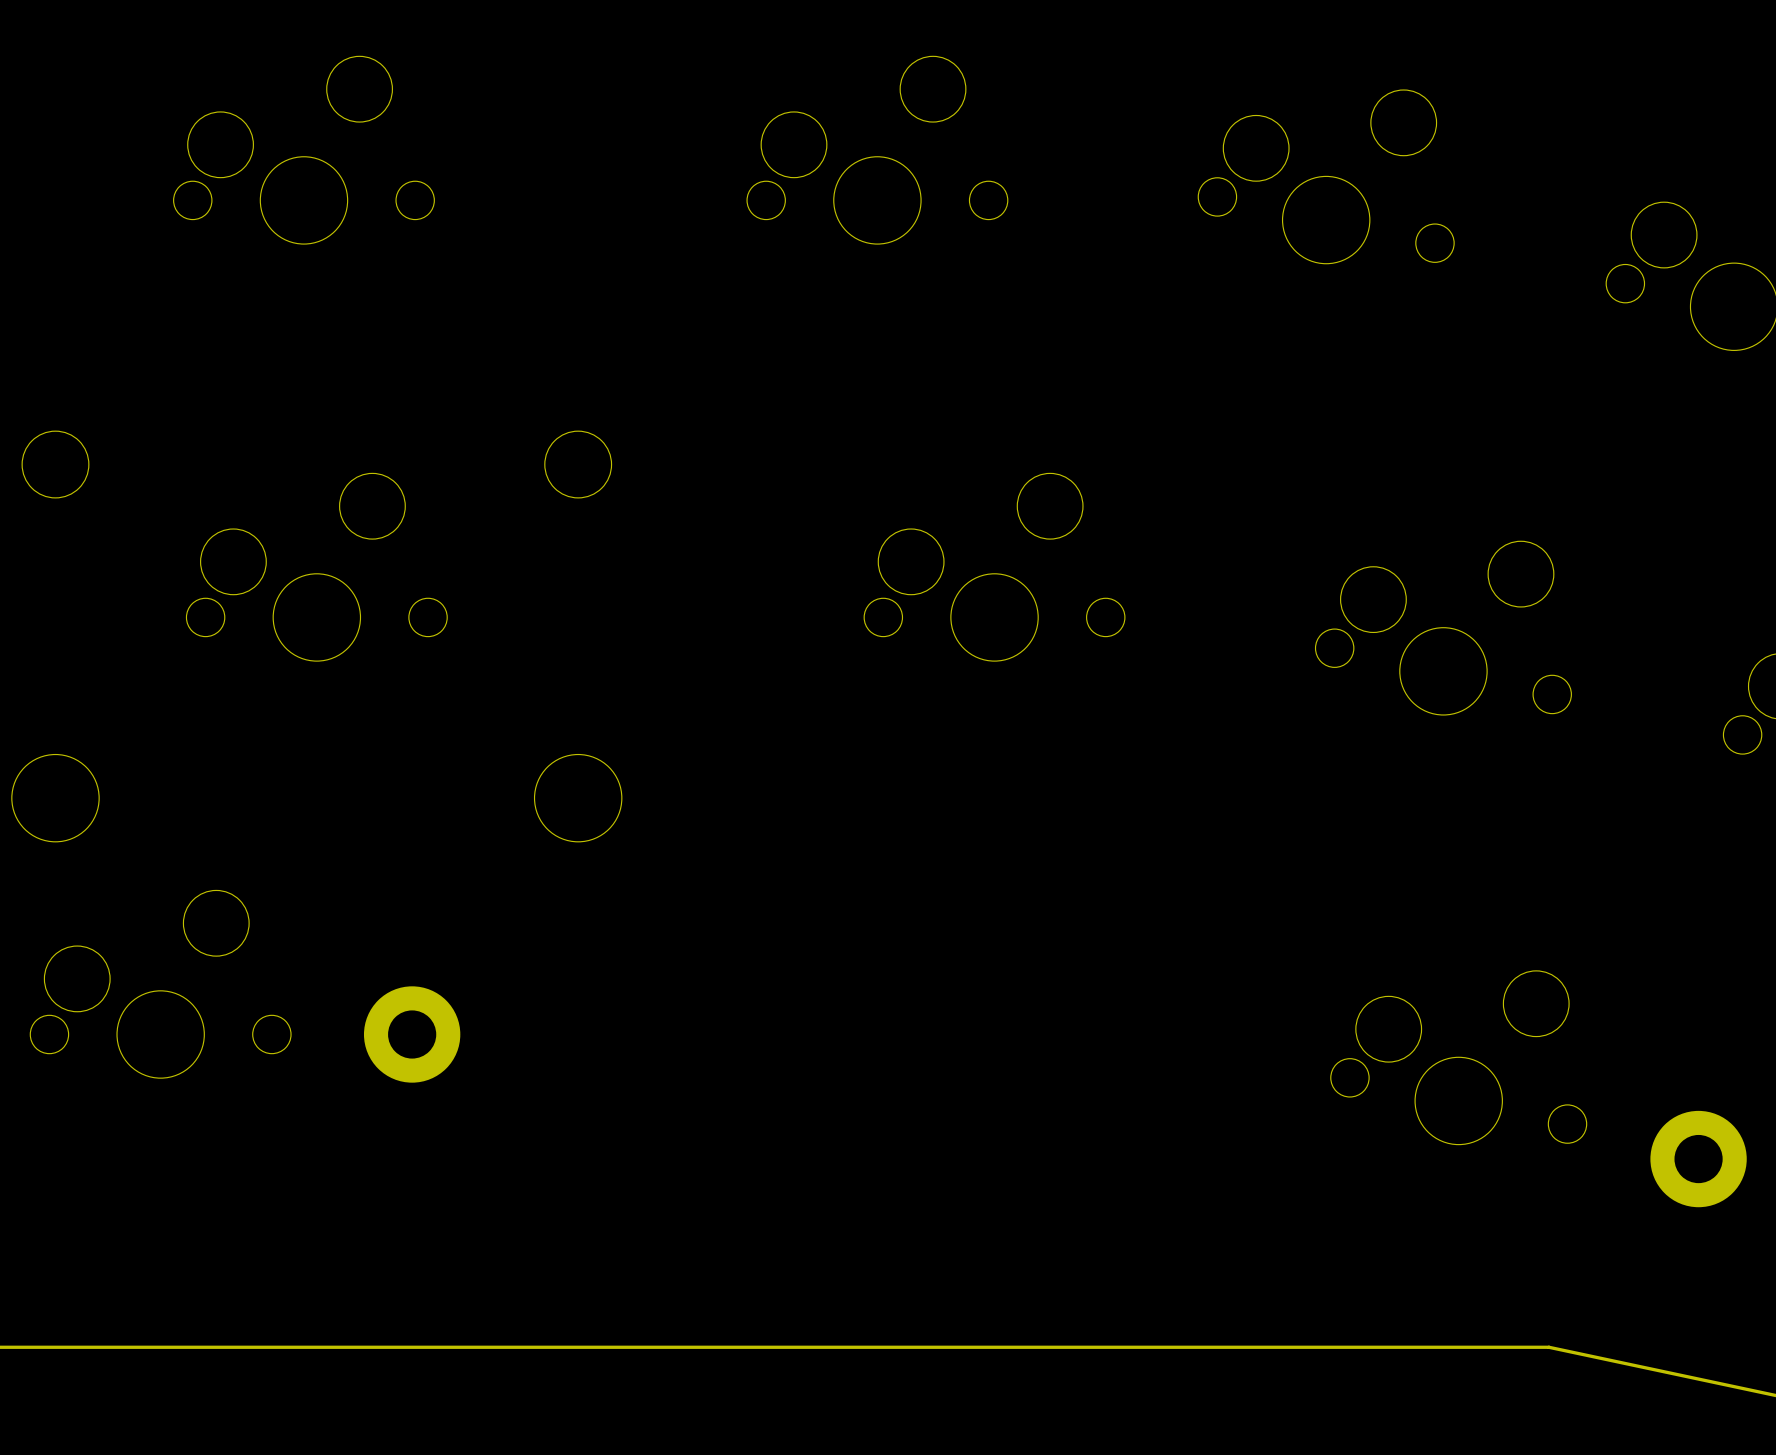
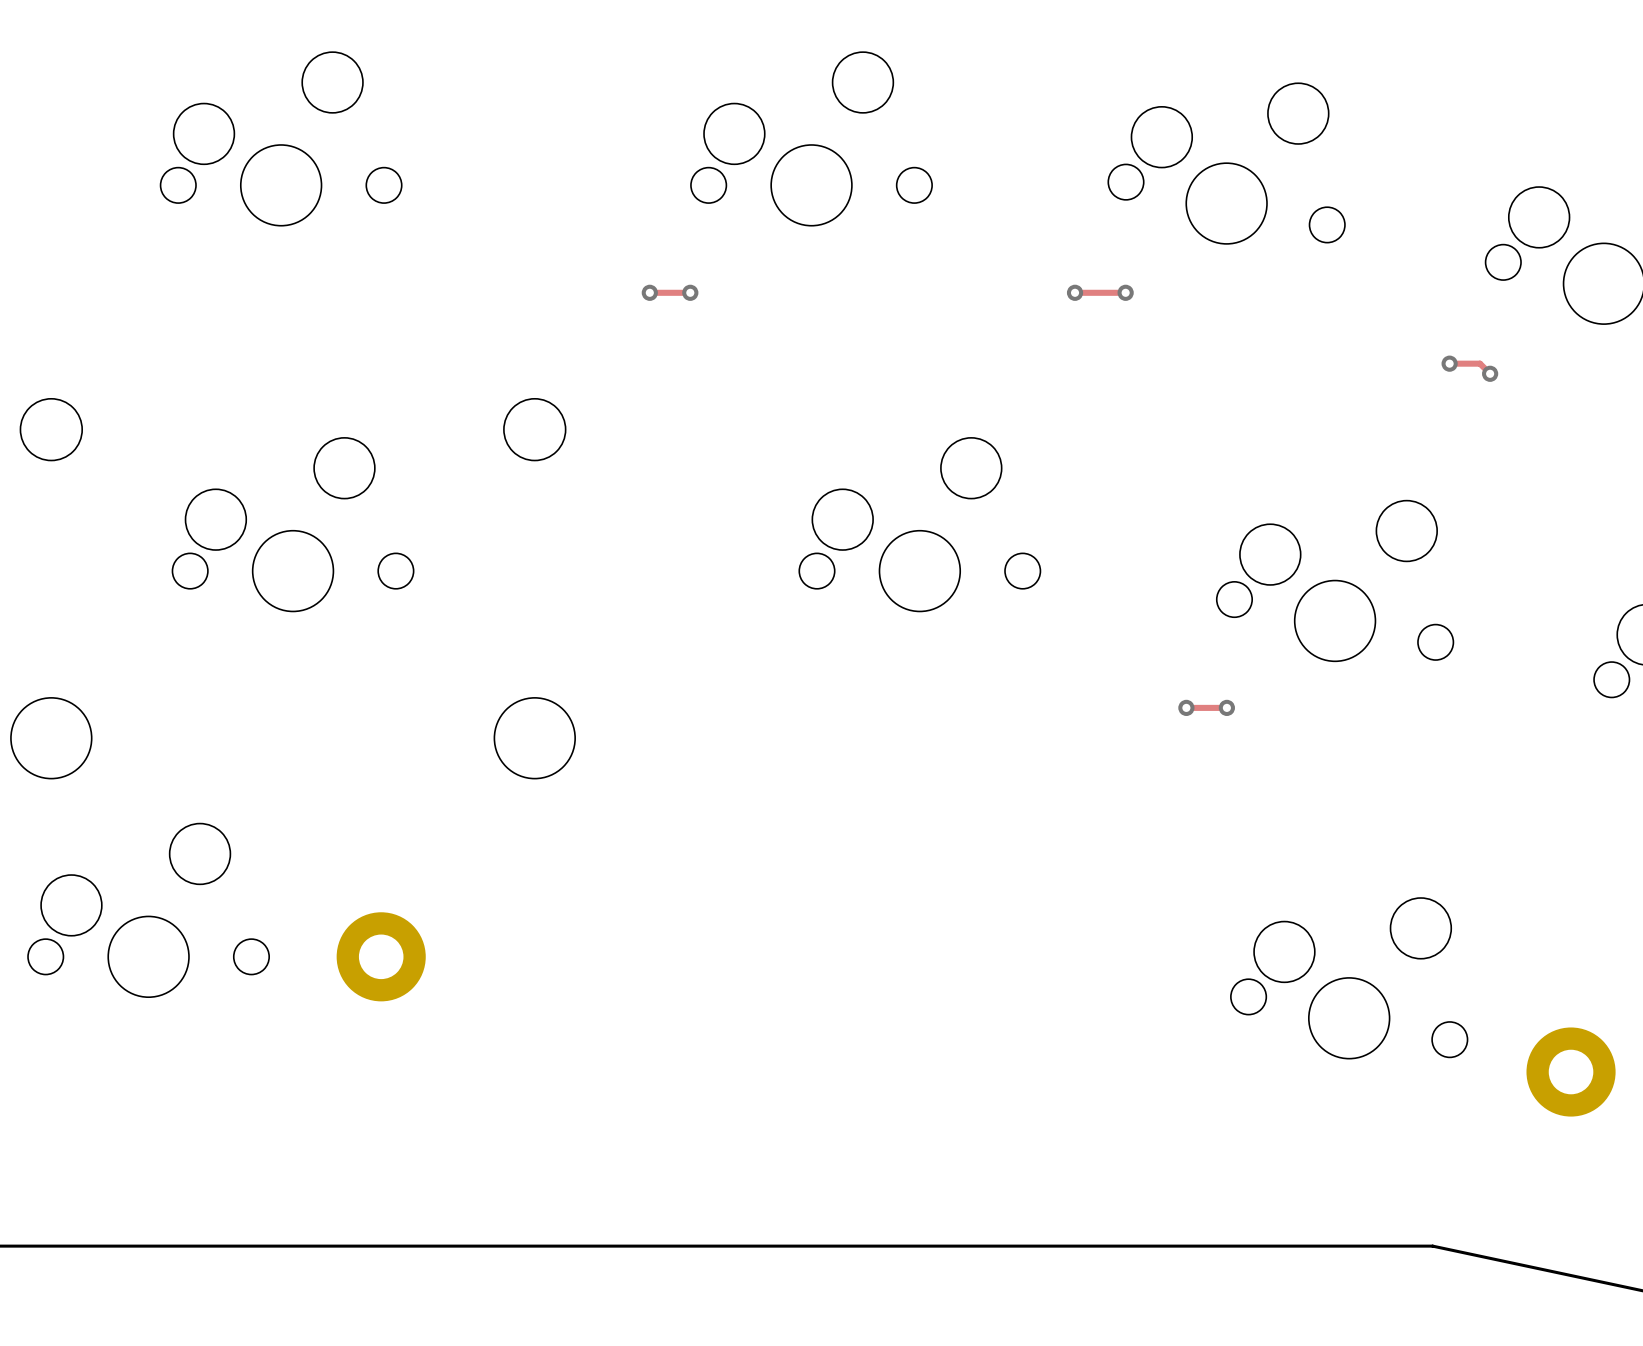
track: none -> (649, 292) (690, 292)
via: none -> (649, 292)
via: none -> (690, 292)
track: none -> (1075, 292) (1125, 292)
via: none -> (1075, 292)
via: none -> (1125, 292)
track: none -> (1449, 363) (1480, 363) (1490, 373)
via: none -> (1449, 363)
via: none -> (1490, 373)
track: none -> (1186, 707) (1226, 707)
via: none -> (1186, 707)
via: none -> (1226, 707)

